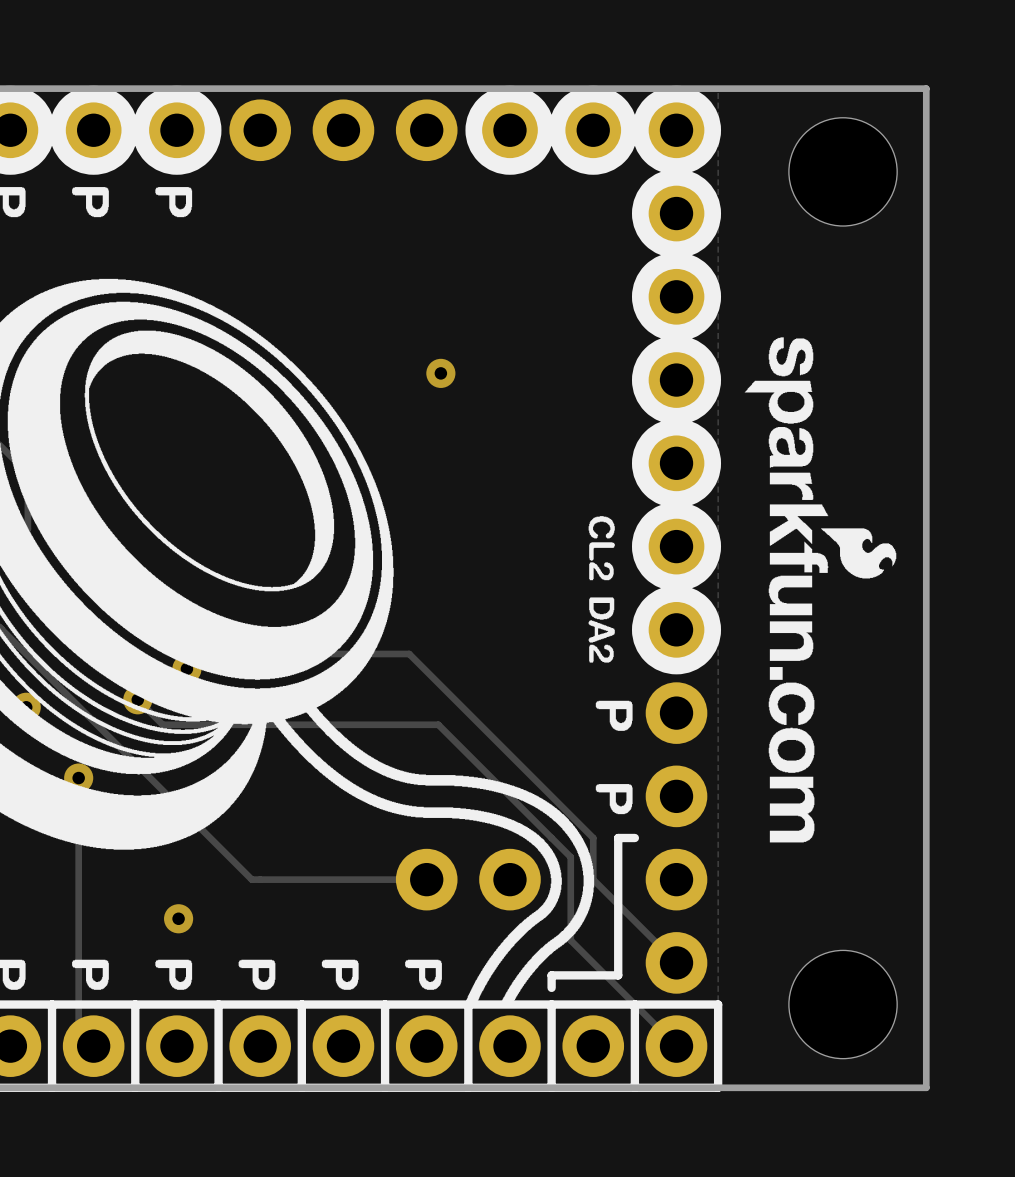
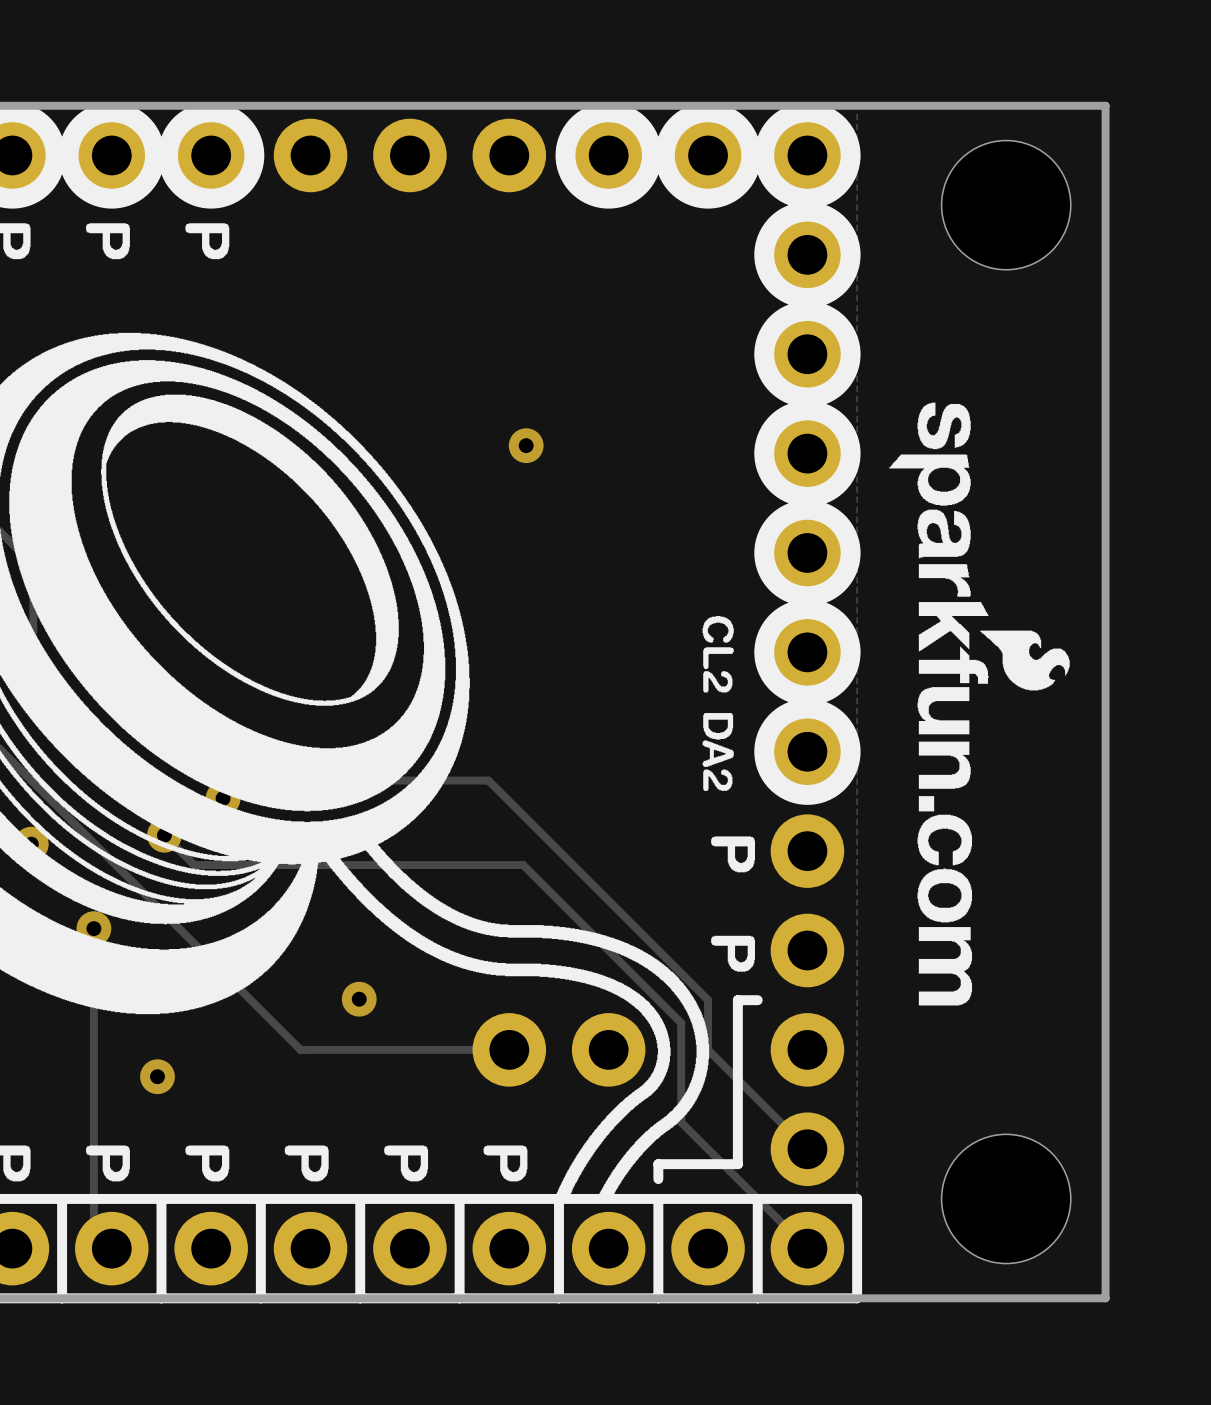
via: none -> (359, 999)
via position: (178, 918) -> (157, 1076)

